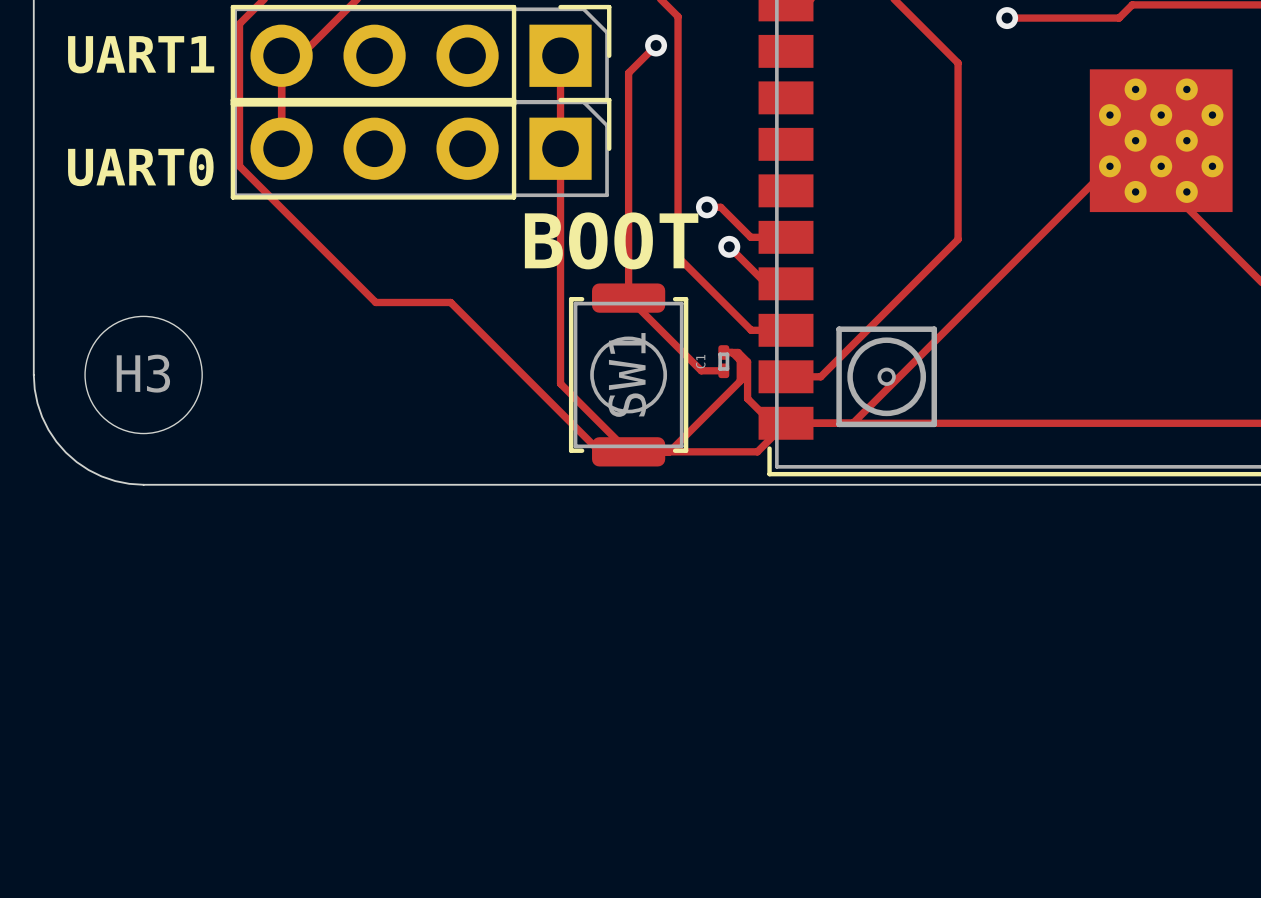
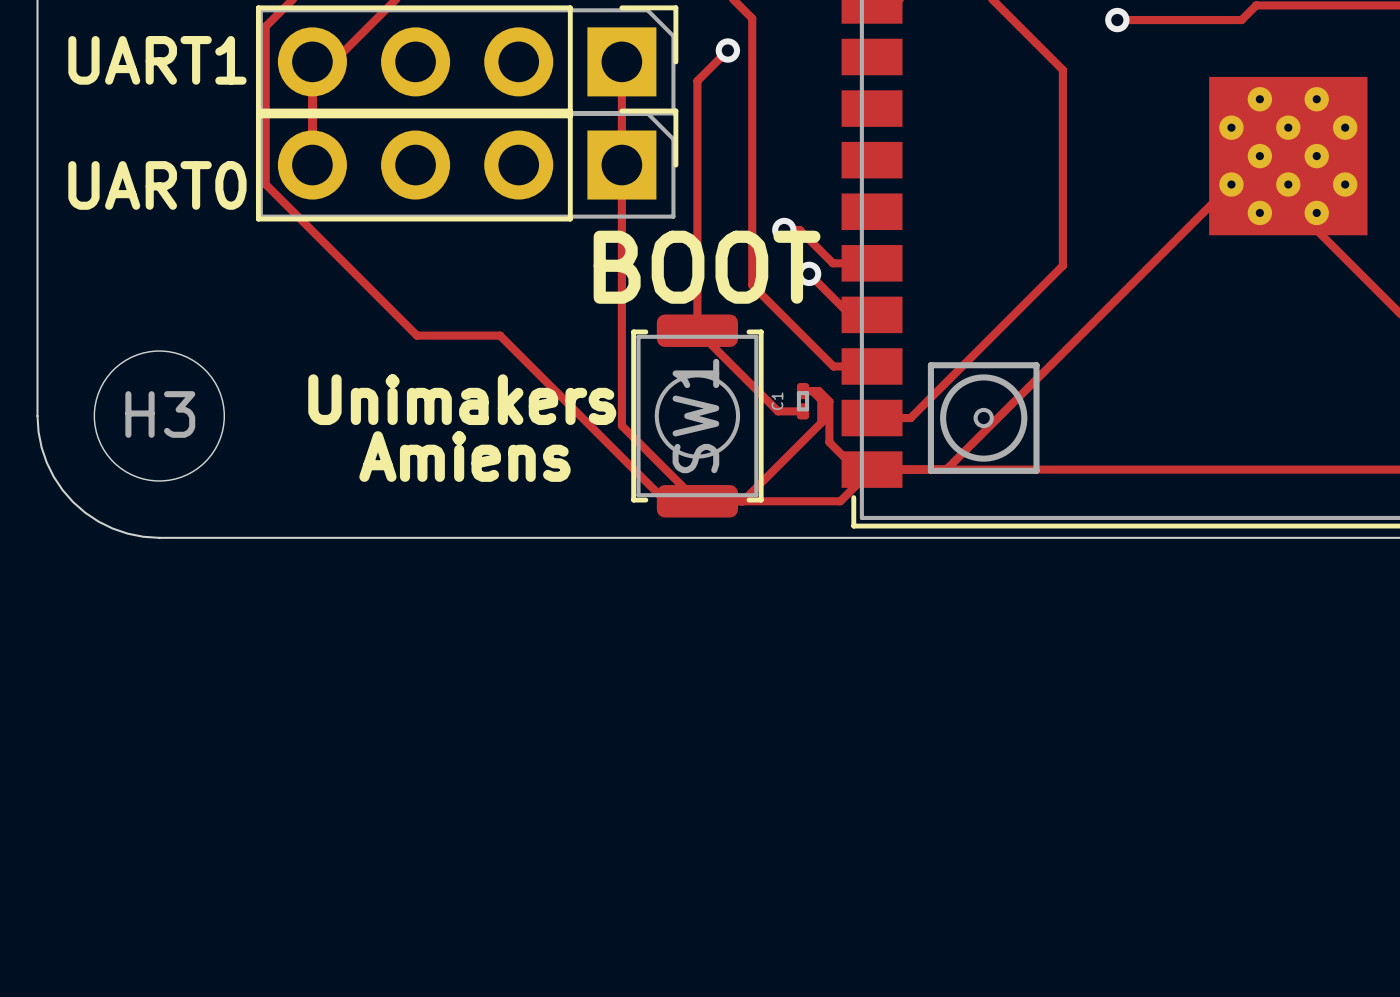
text: none -> Unimakers (462, 399)
text: none -> Amiens (464, 456)

